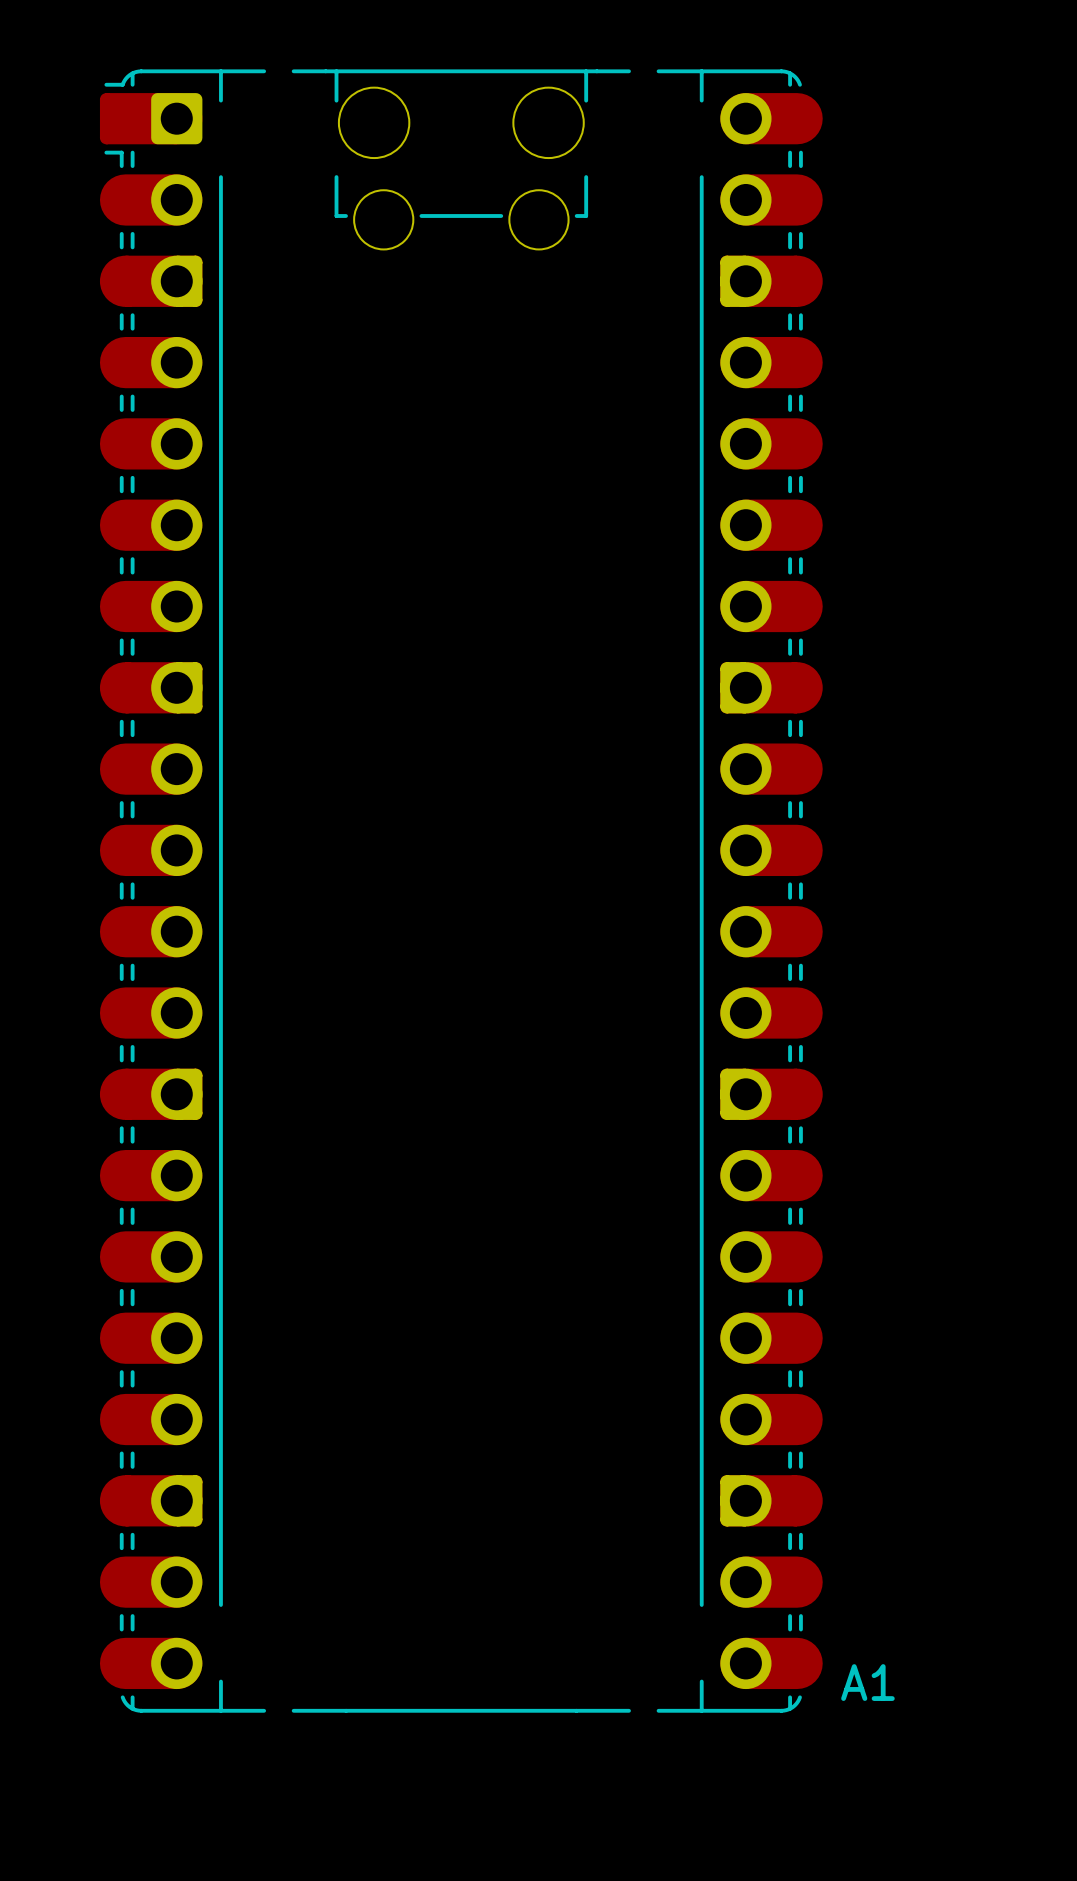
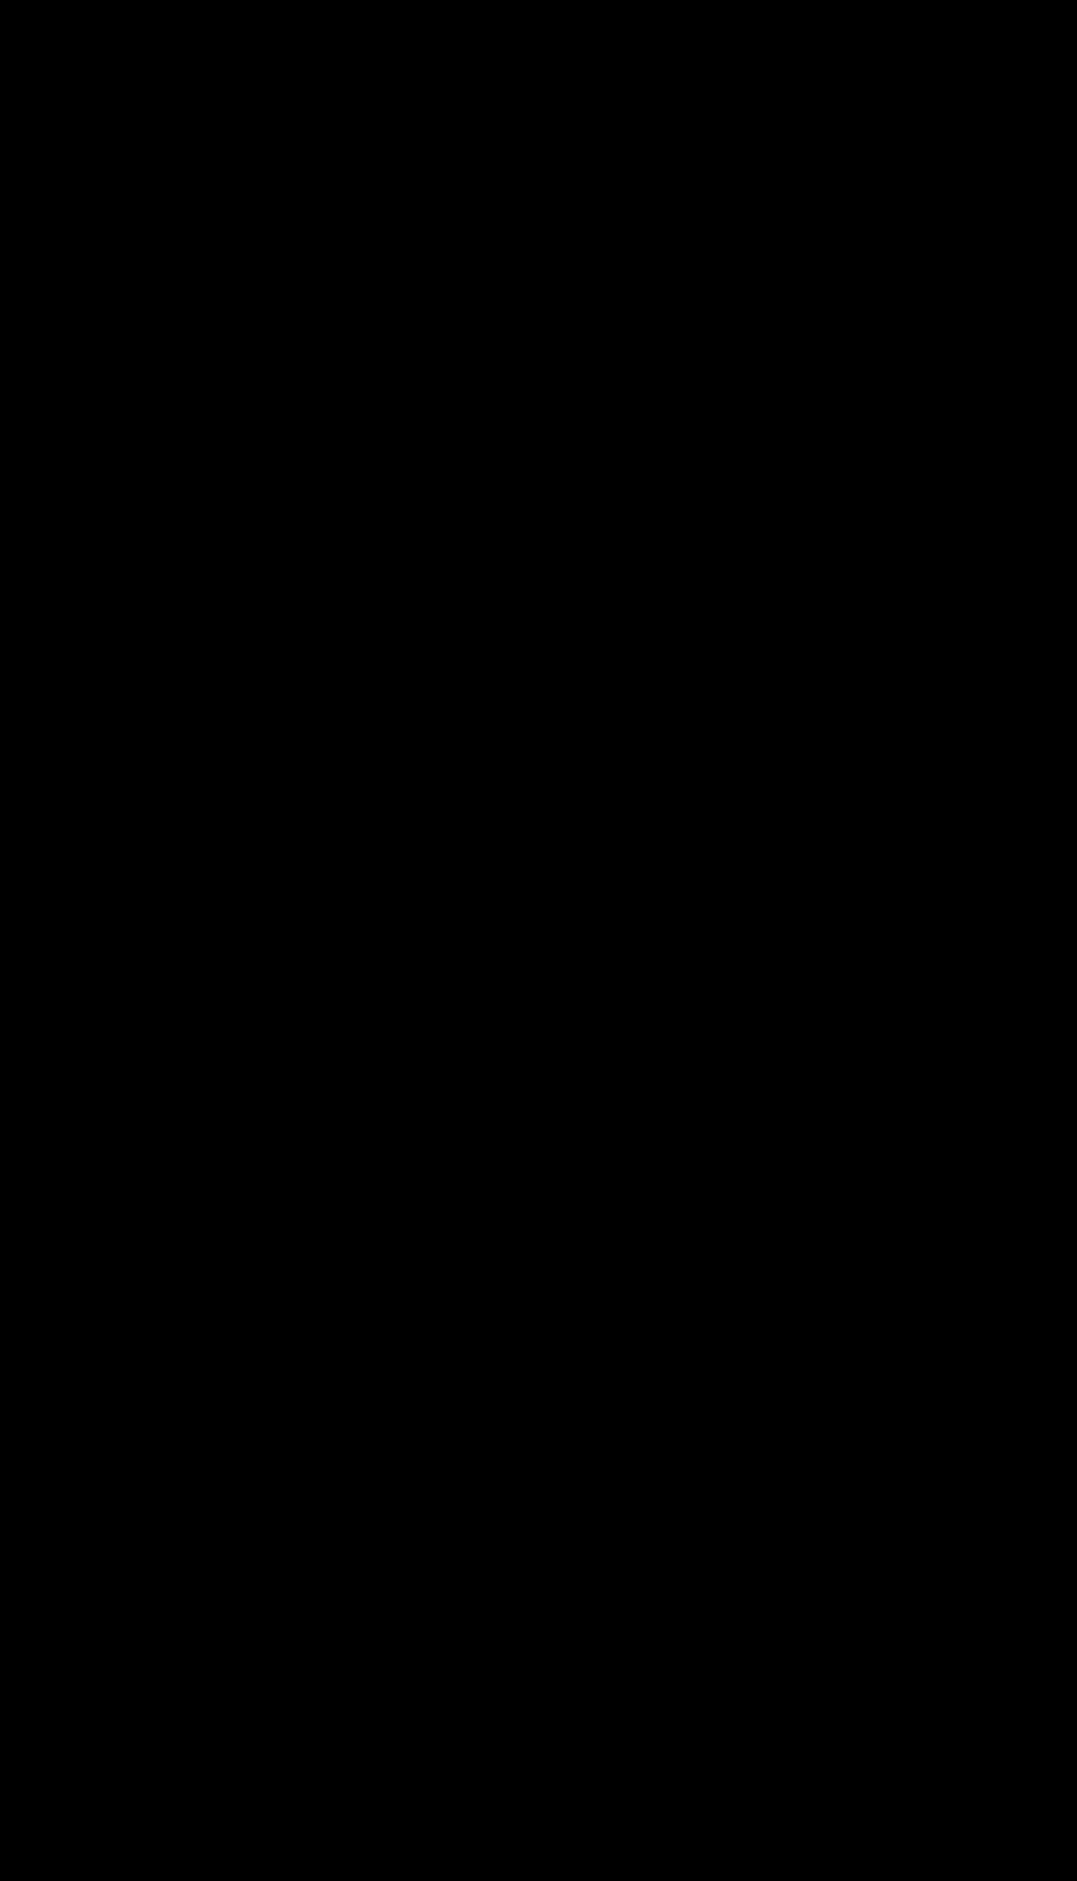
A1: (461, 891) -> none

